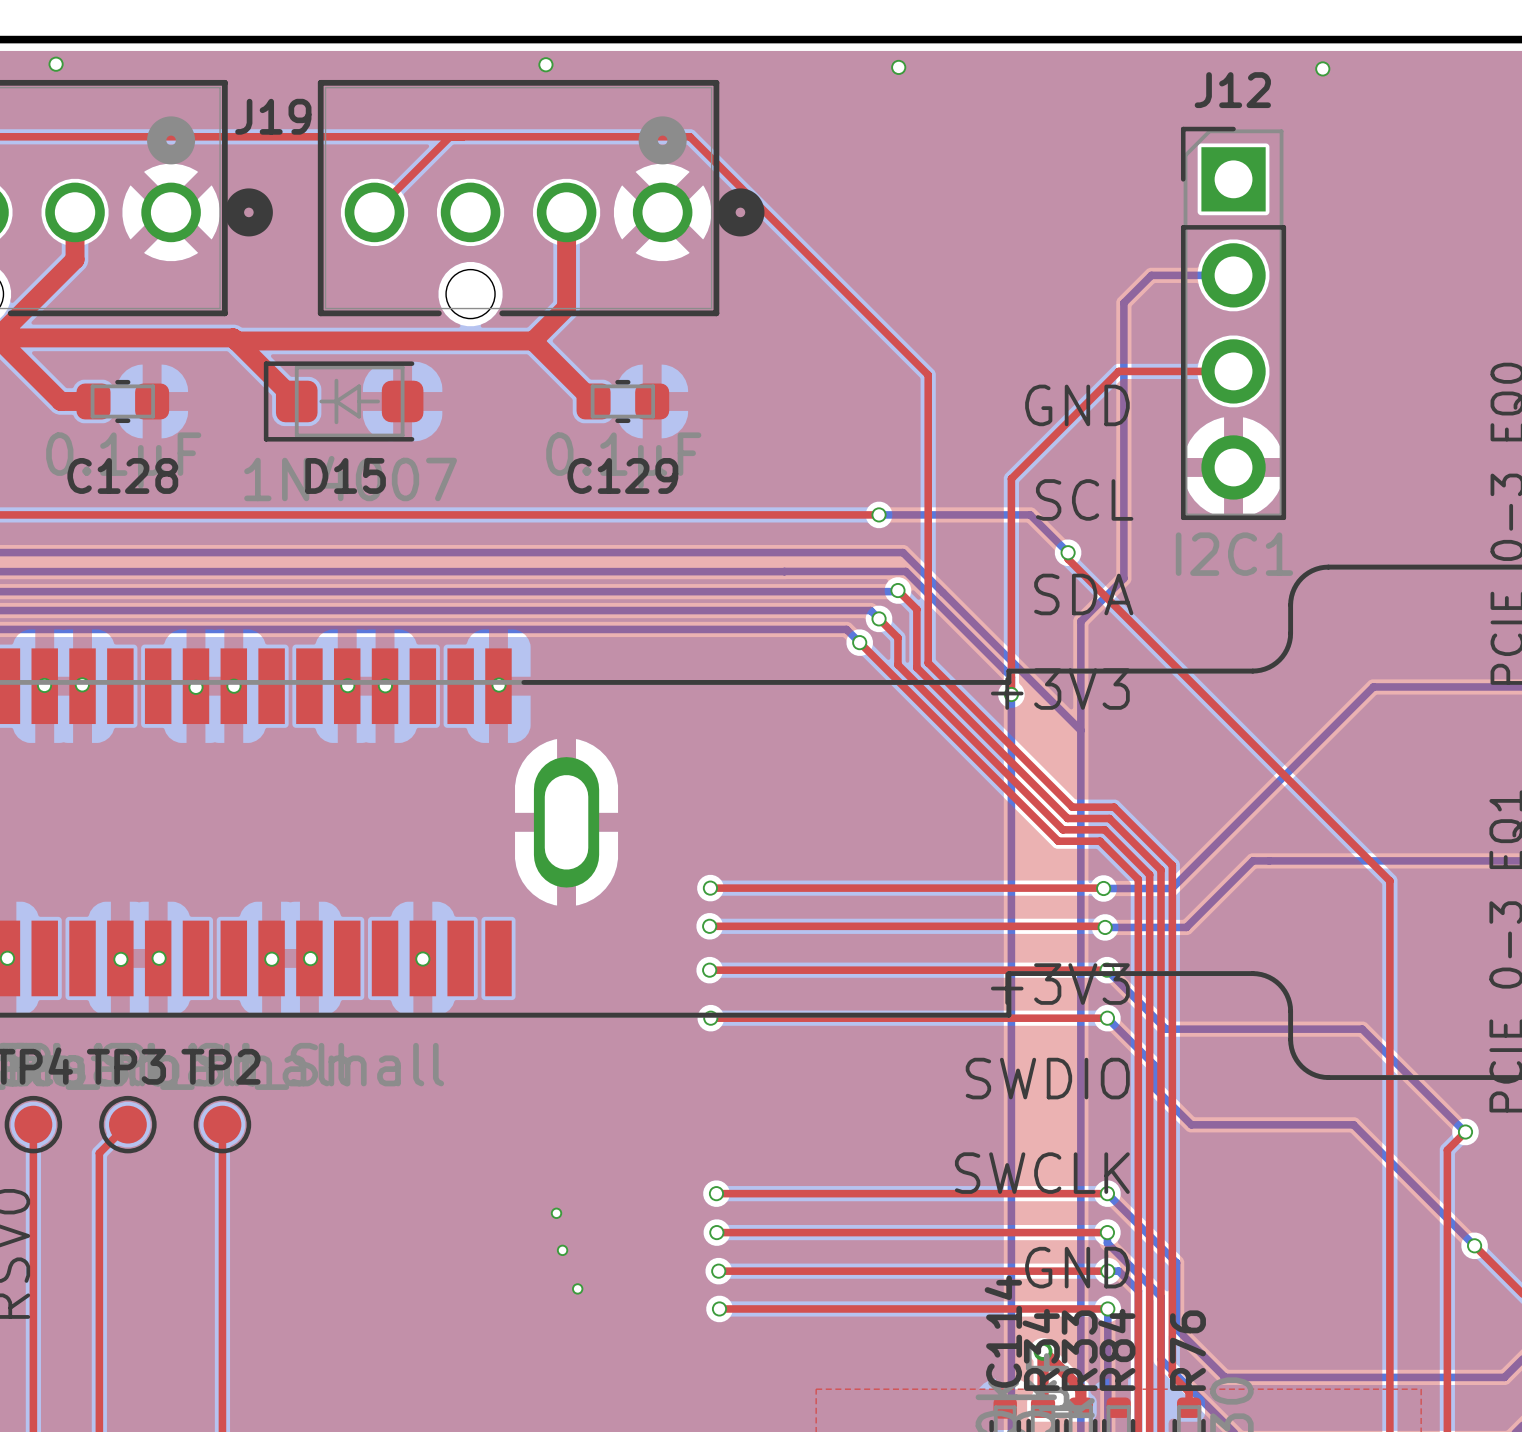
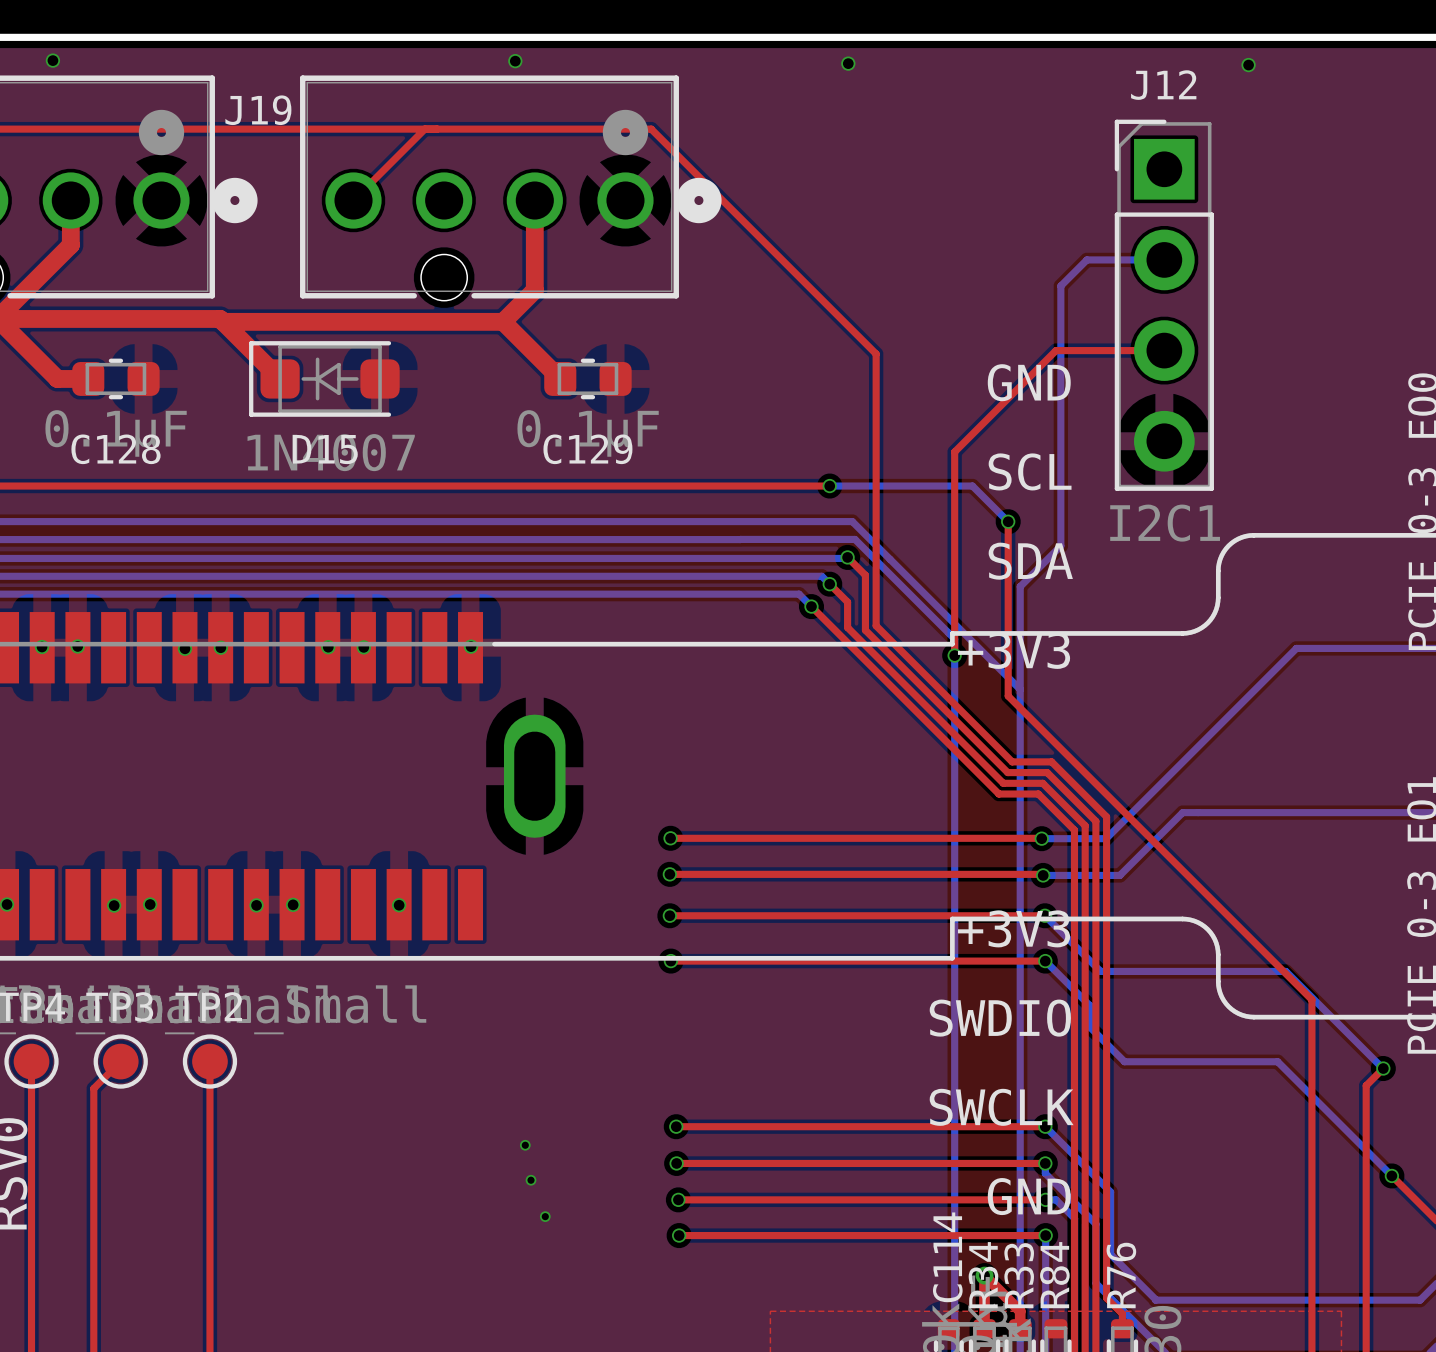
top track: (1068, 559) (1389, 880) (1389, 1059) -> (1008, 527) (1008, 696) (1311, 999)

